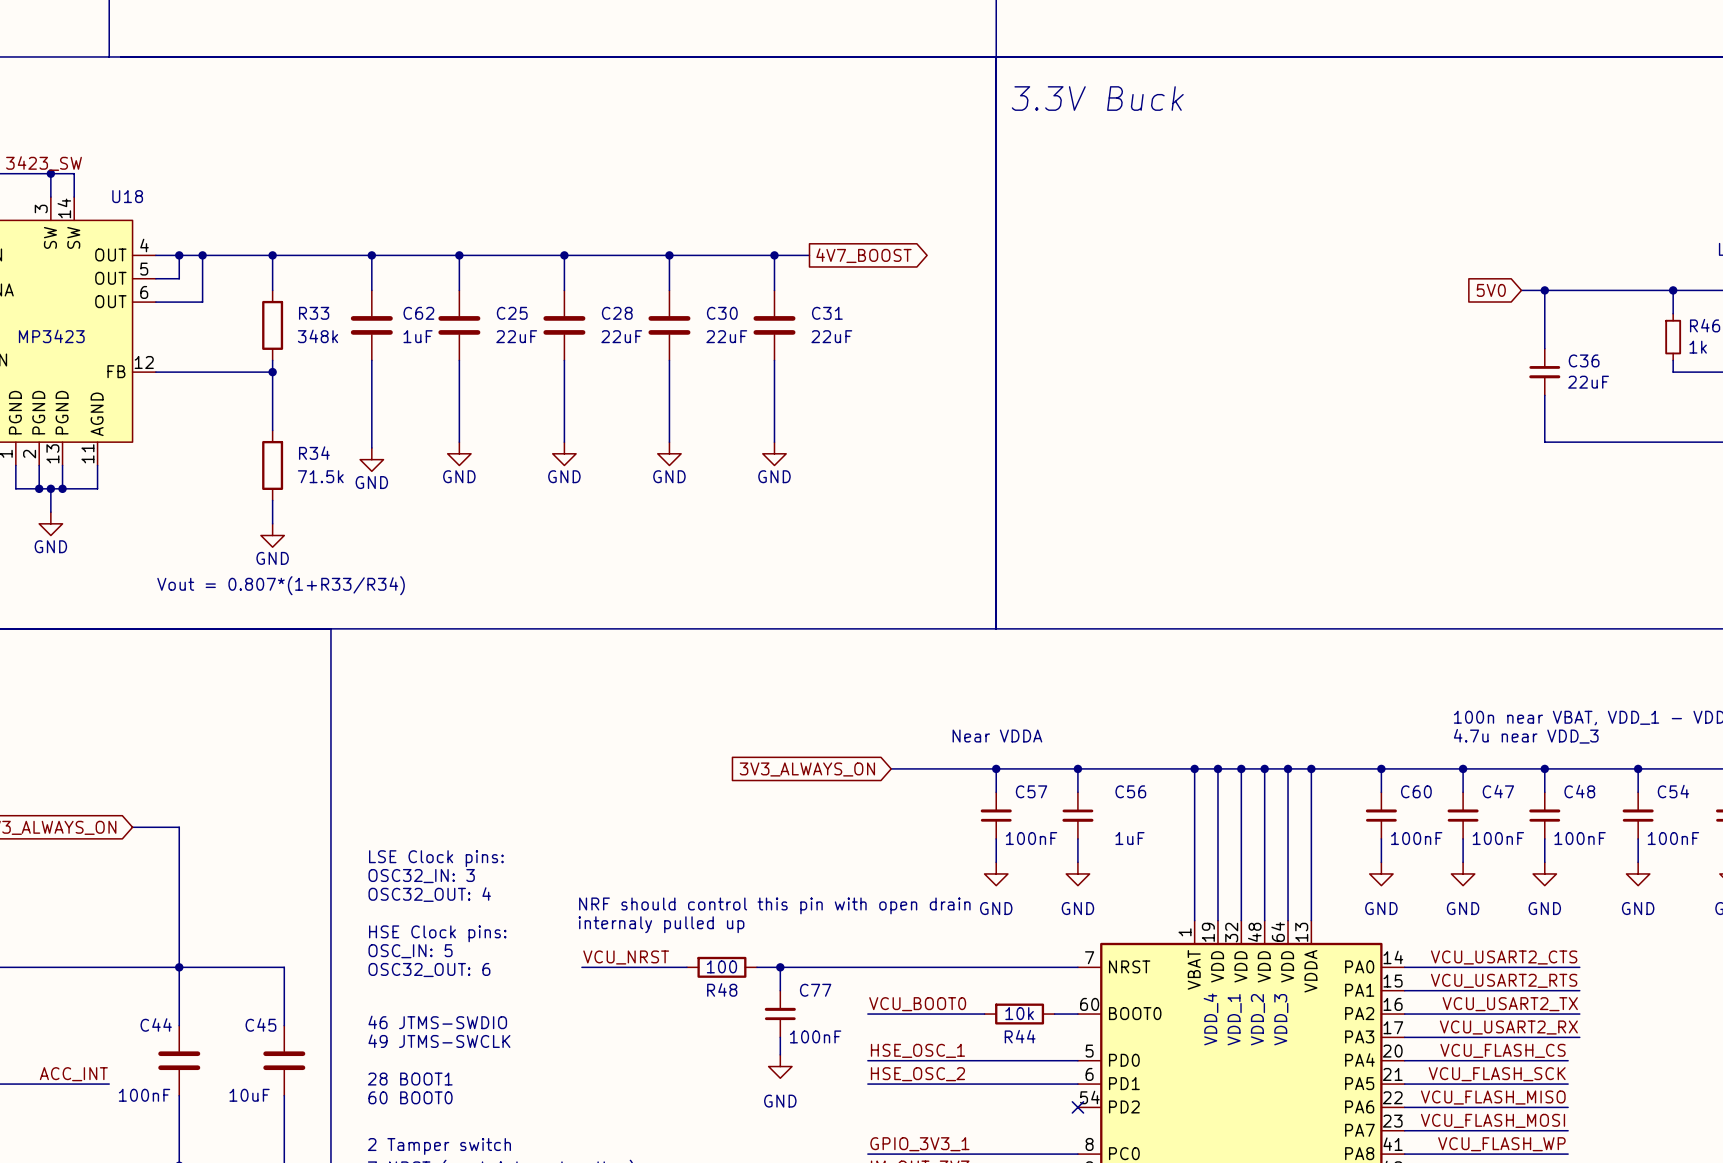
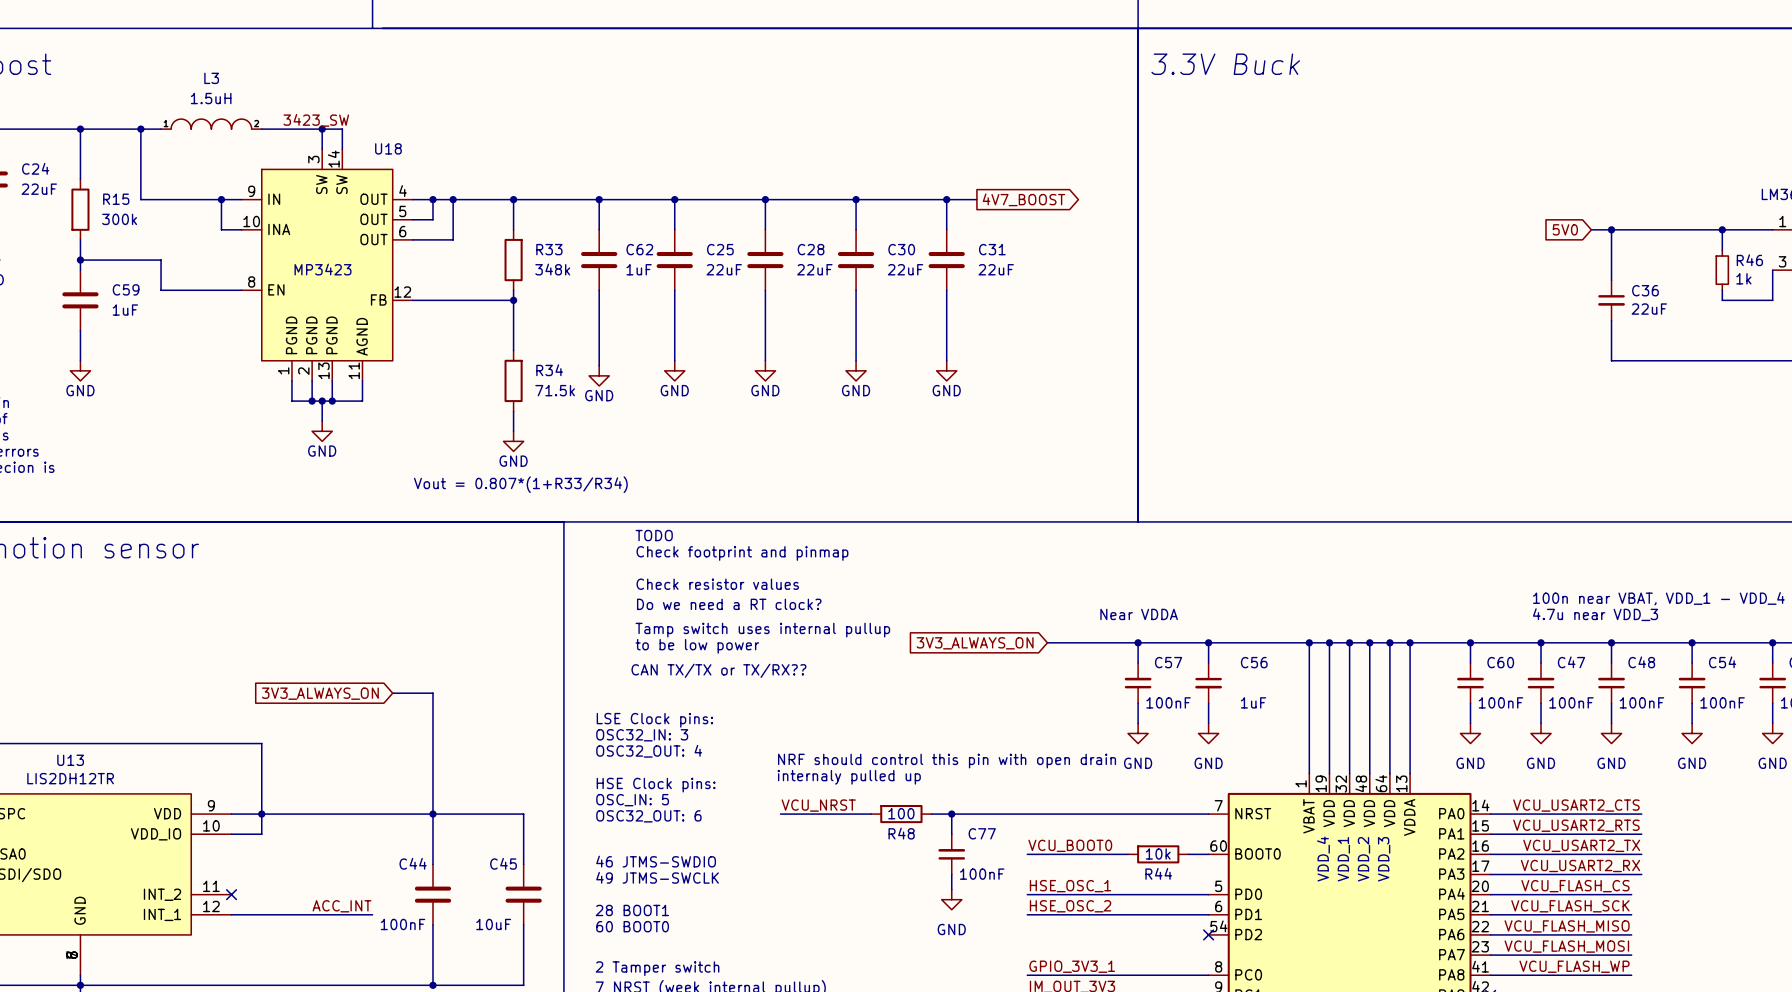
text: none -> TODO (654, 535)
text: none -> Check footprint and pinmap (742, 553)
text: none -> Check resistor values (717, 584)
text: none -> Do we need a RT clock? (729, 604)
text: none -> Tamp switch uses internal pullup (762, 630)
text: none -> to be low power (697, 646)
text: none -> CAN TX/TX or TX/RX?? (718, 670)

